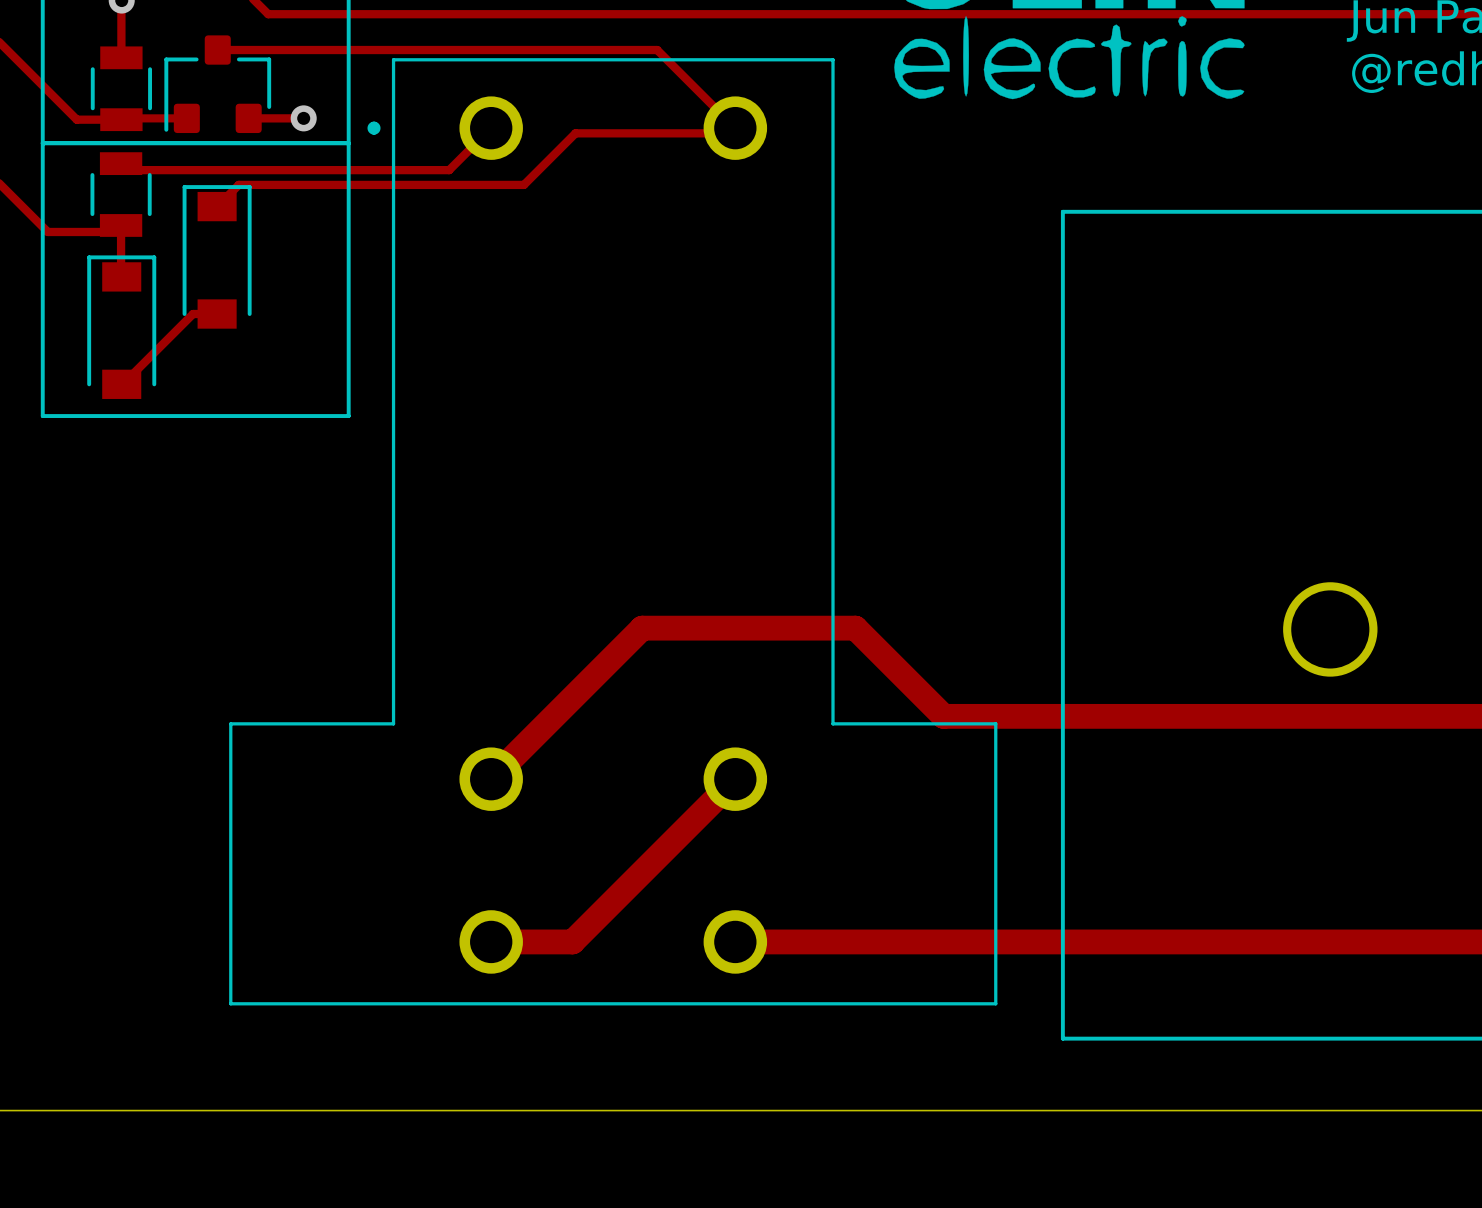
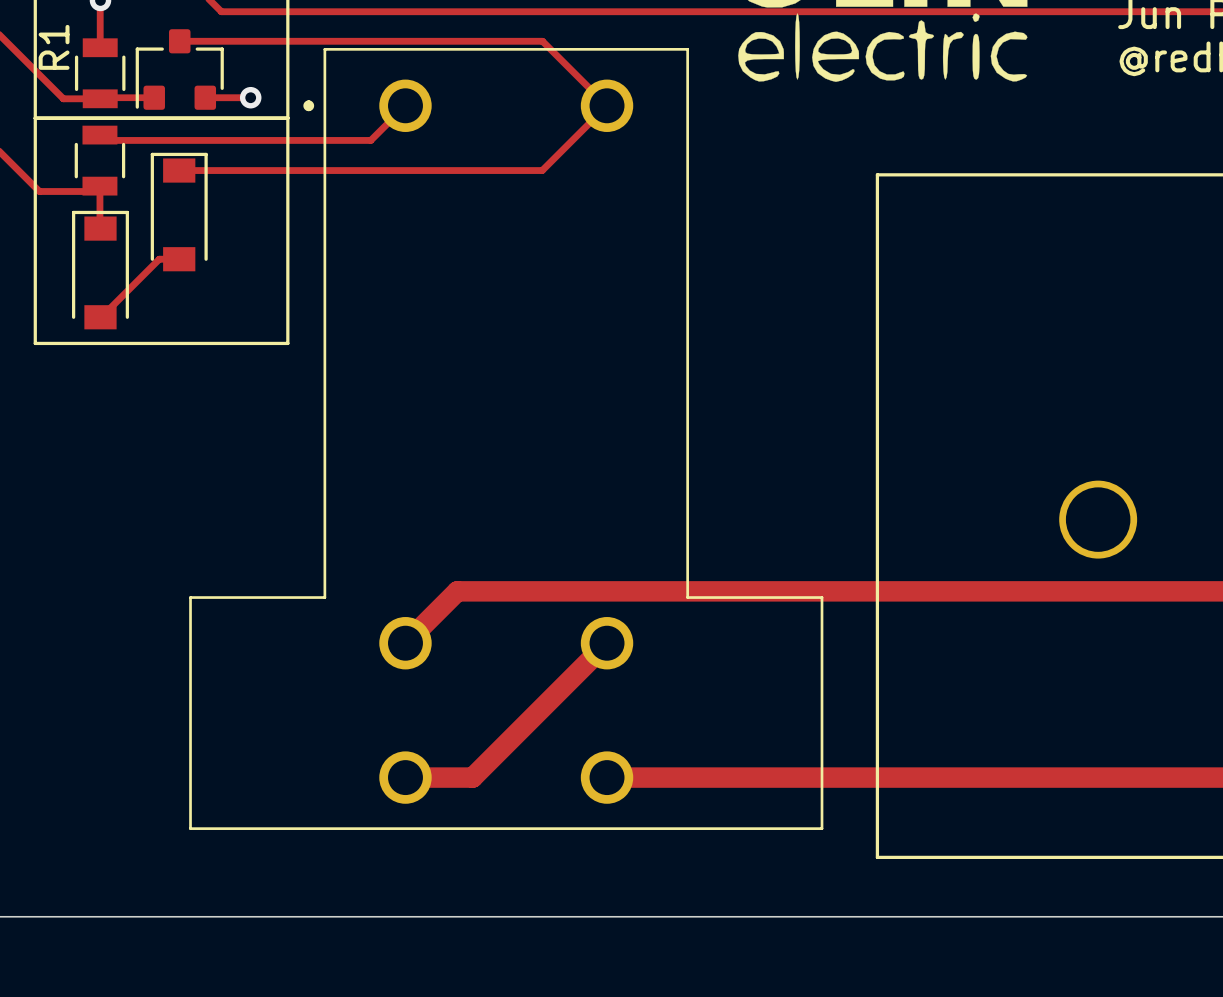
R1 name: none -> R1 (54, 47)
track: (730, 133) (575, 133) (523, 184) (238, 184) (217, 206) -> (602, 110) (542, 170) (179, 170)
track: (554, 716) (642, 628) (855, 628) (943, 716) -> (457, 591) (779, 591)

